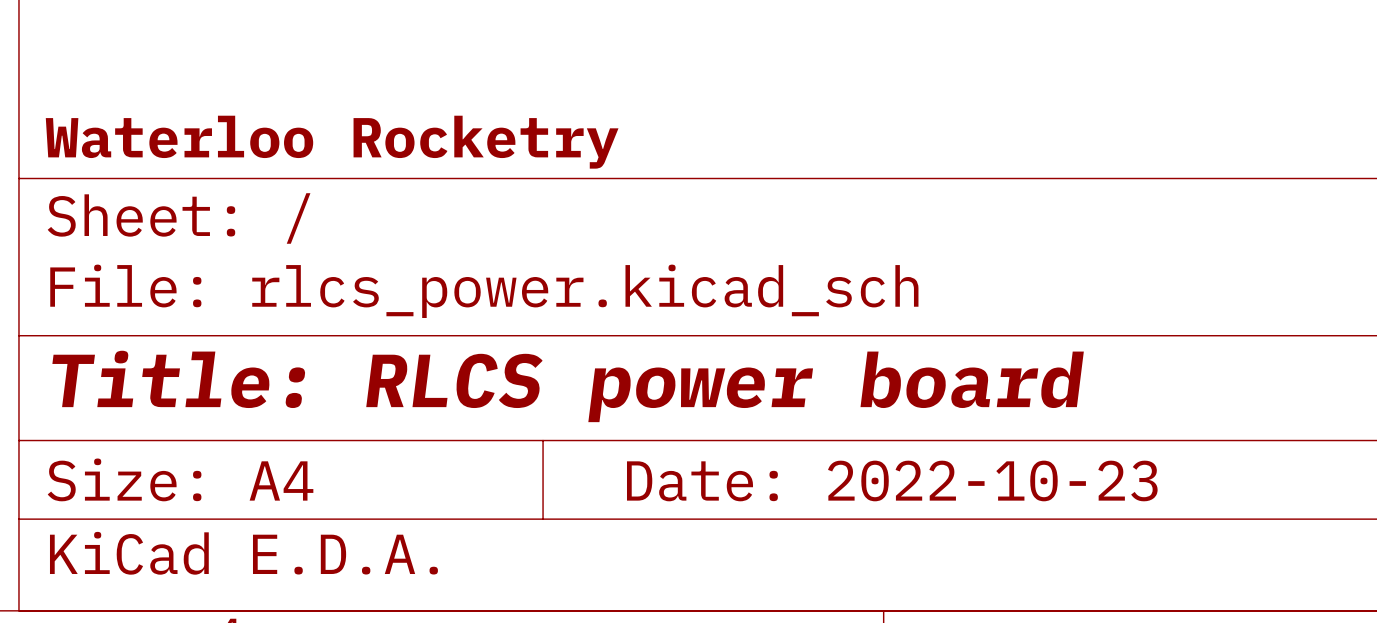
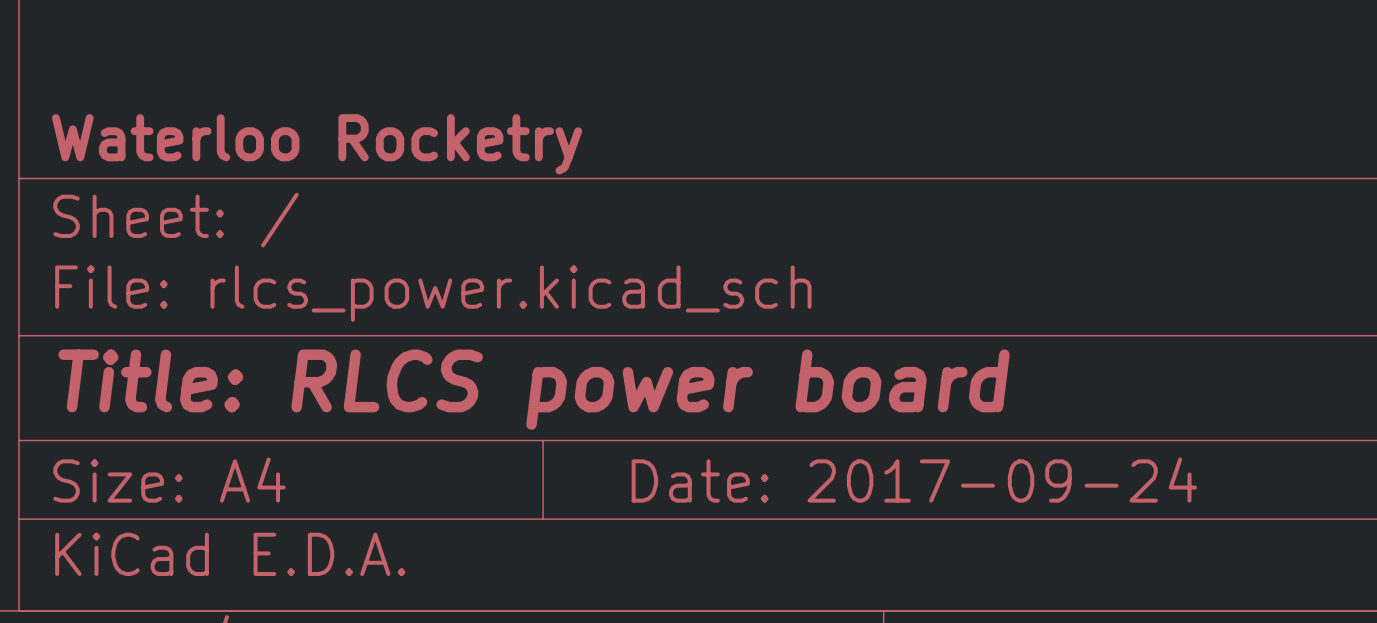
title block: Date: 2022-10-23 (892, 480) -> Date: 2017-09-24 (914, 480)

